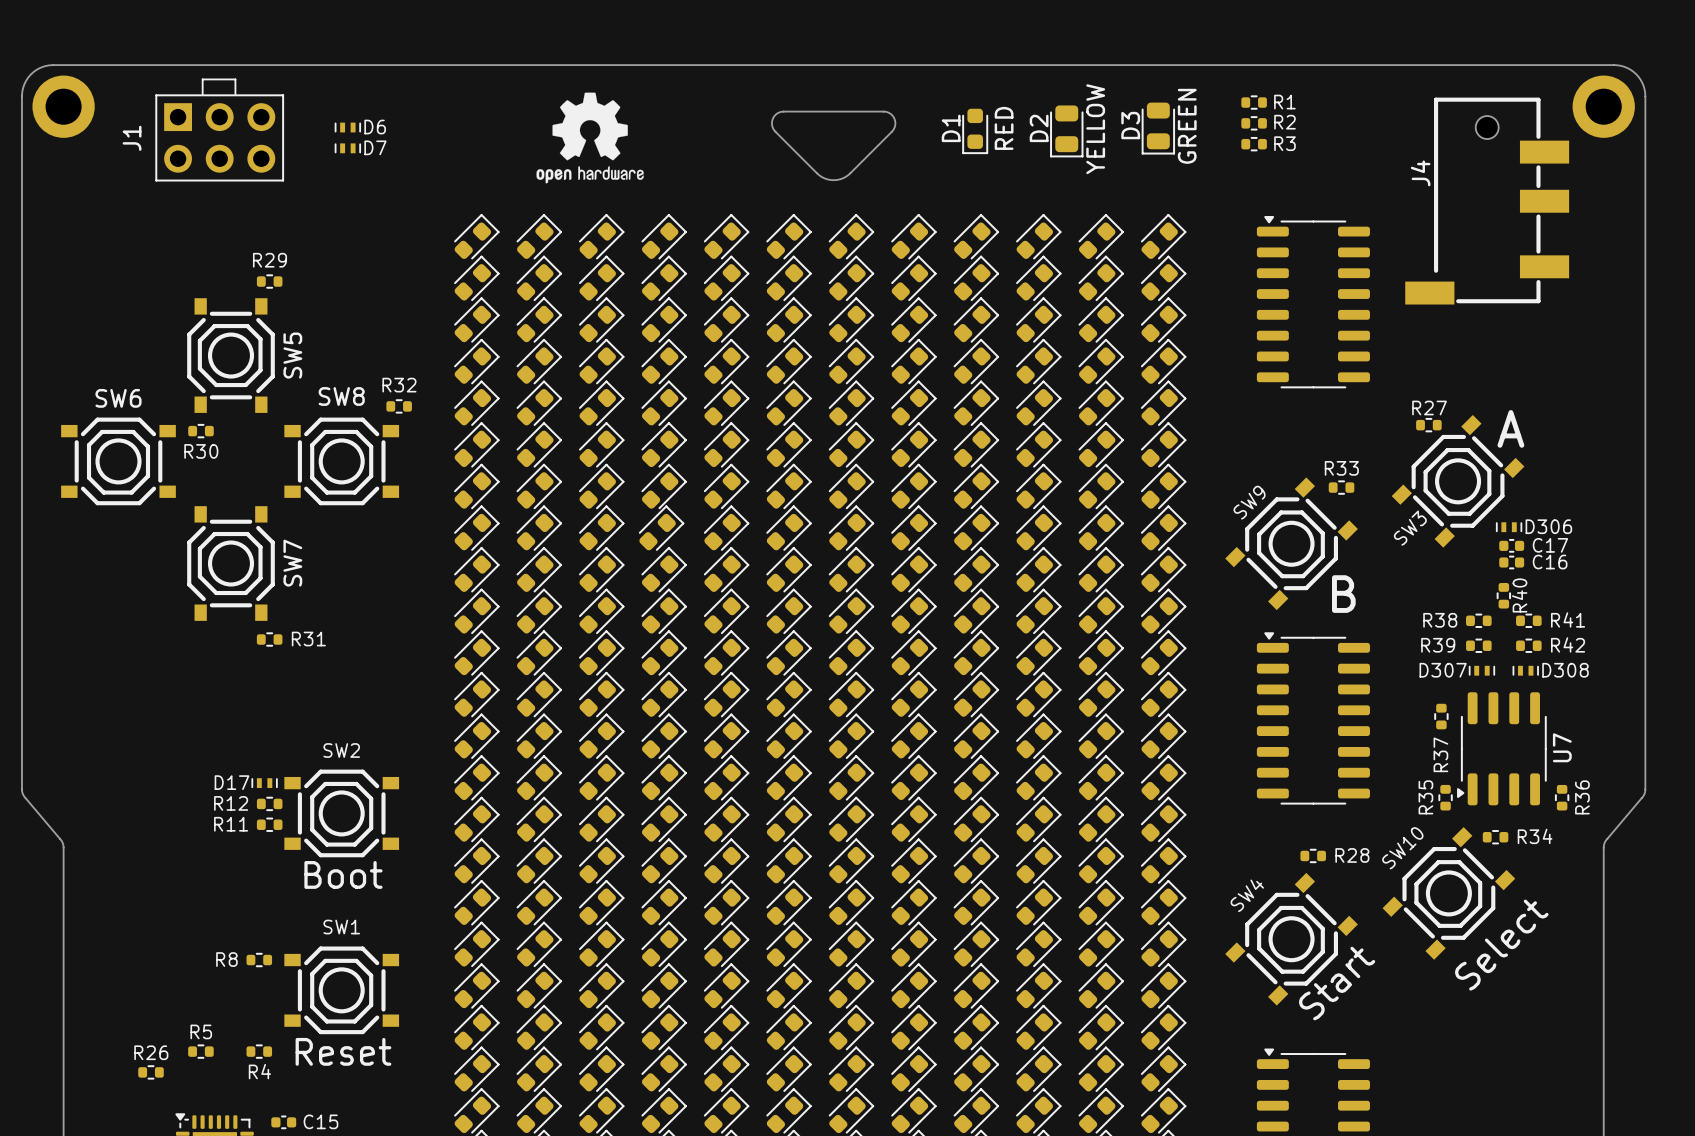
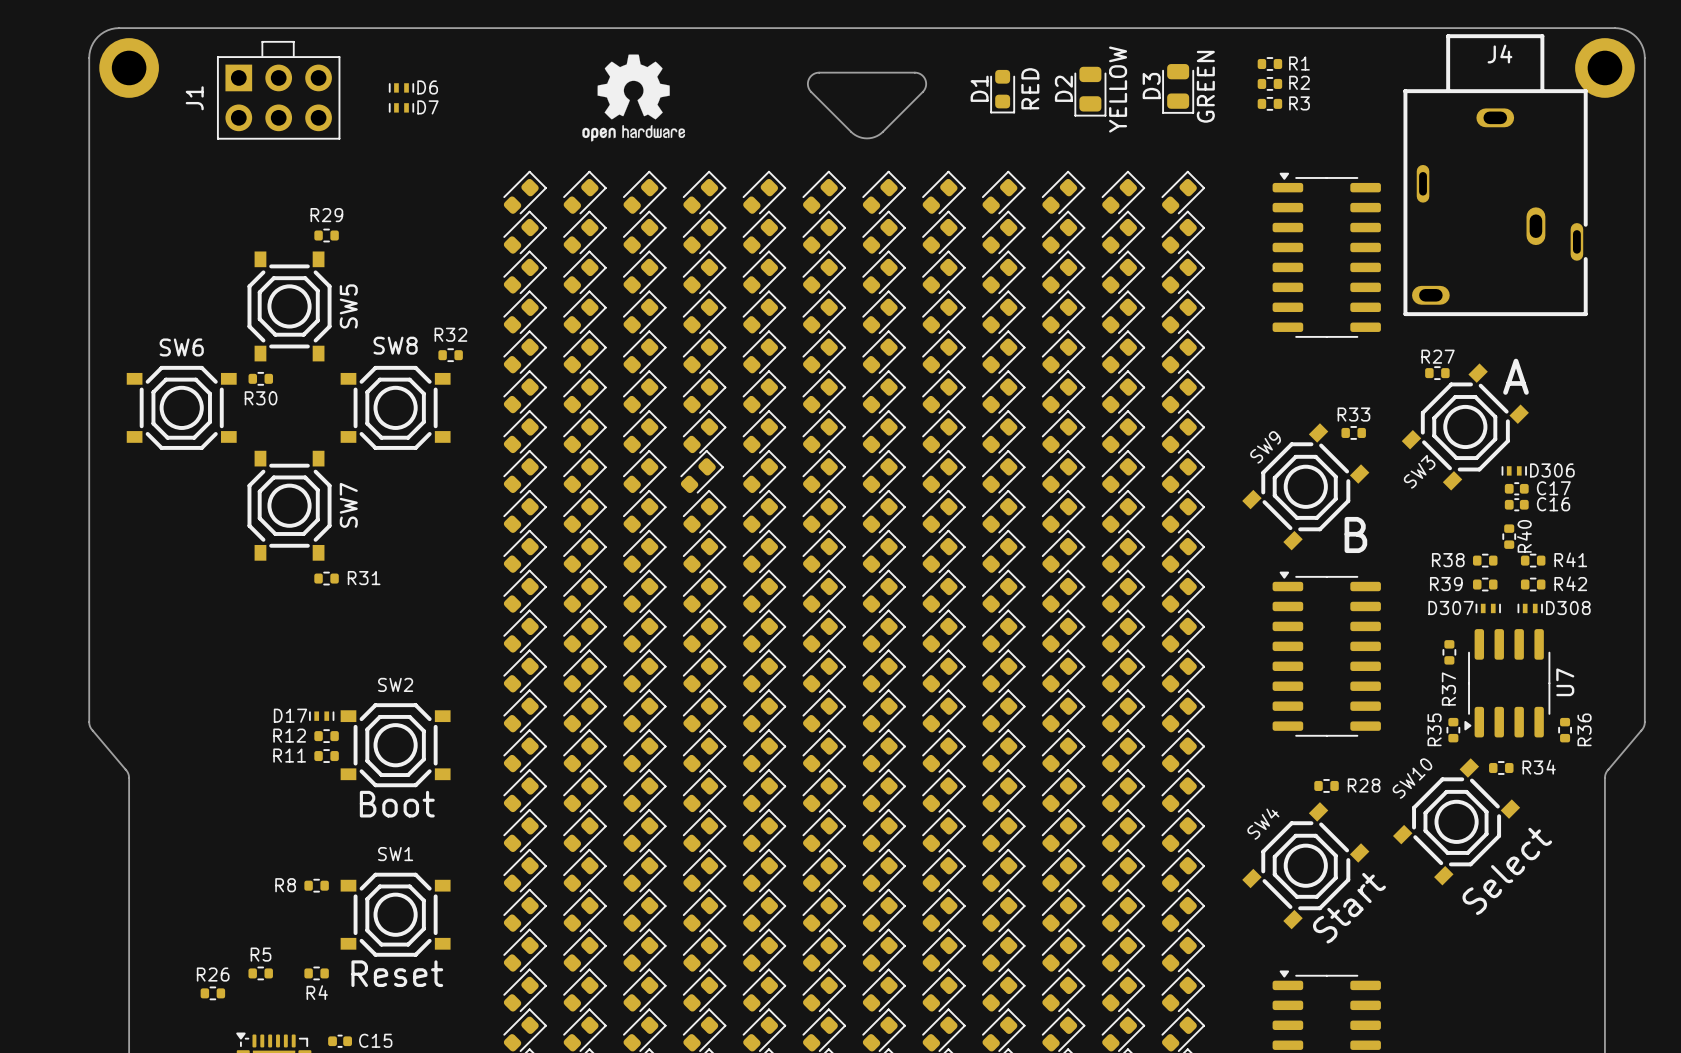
J4 footprint: [1405, 97, 1570, 305] -> [1403, 34, 1588, 317]
J4 name position: J4 (1420, 173) -> J4 (1499, 54)

